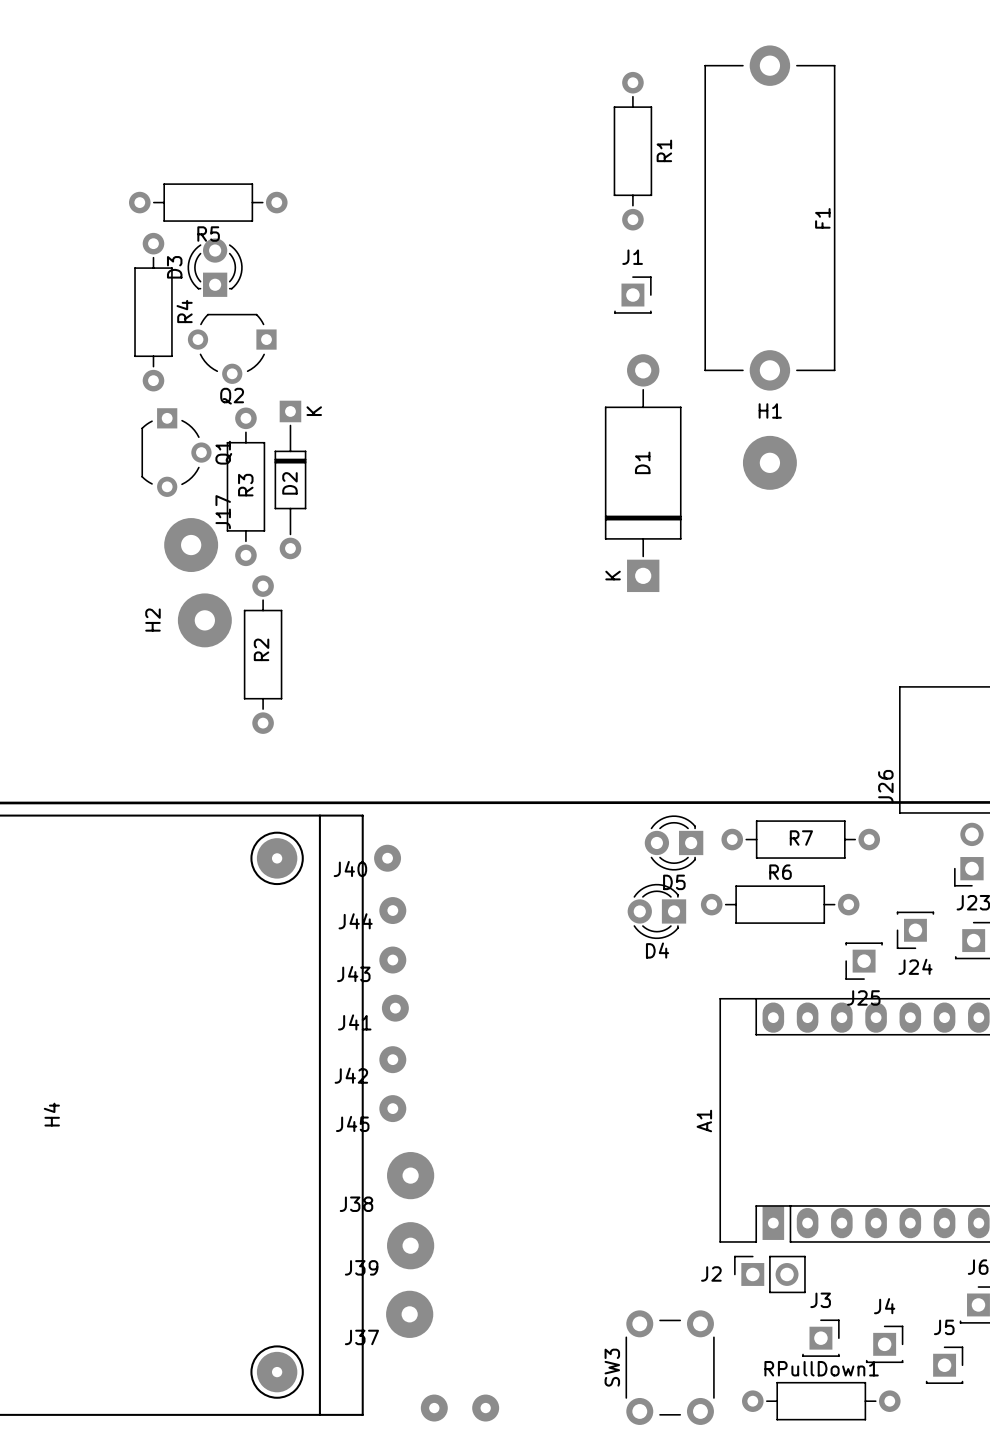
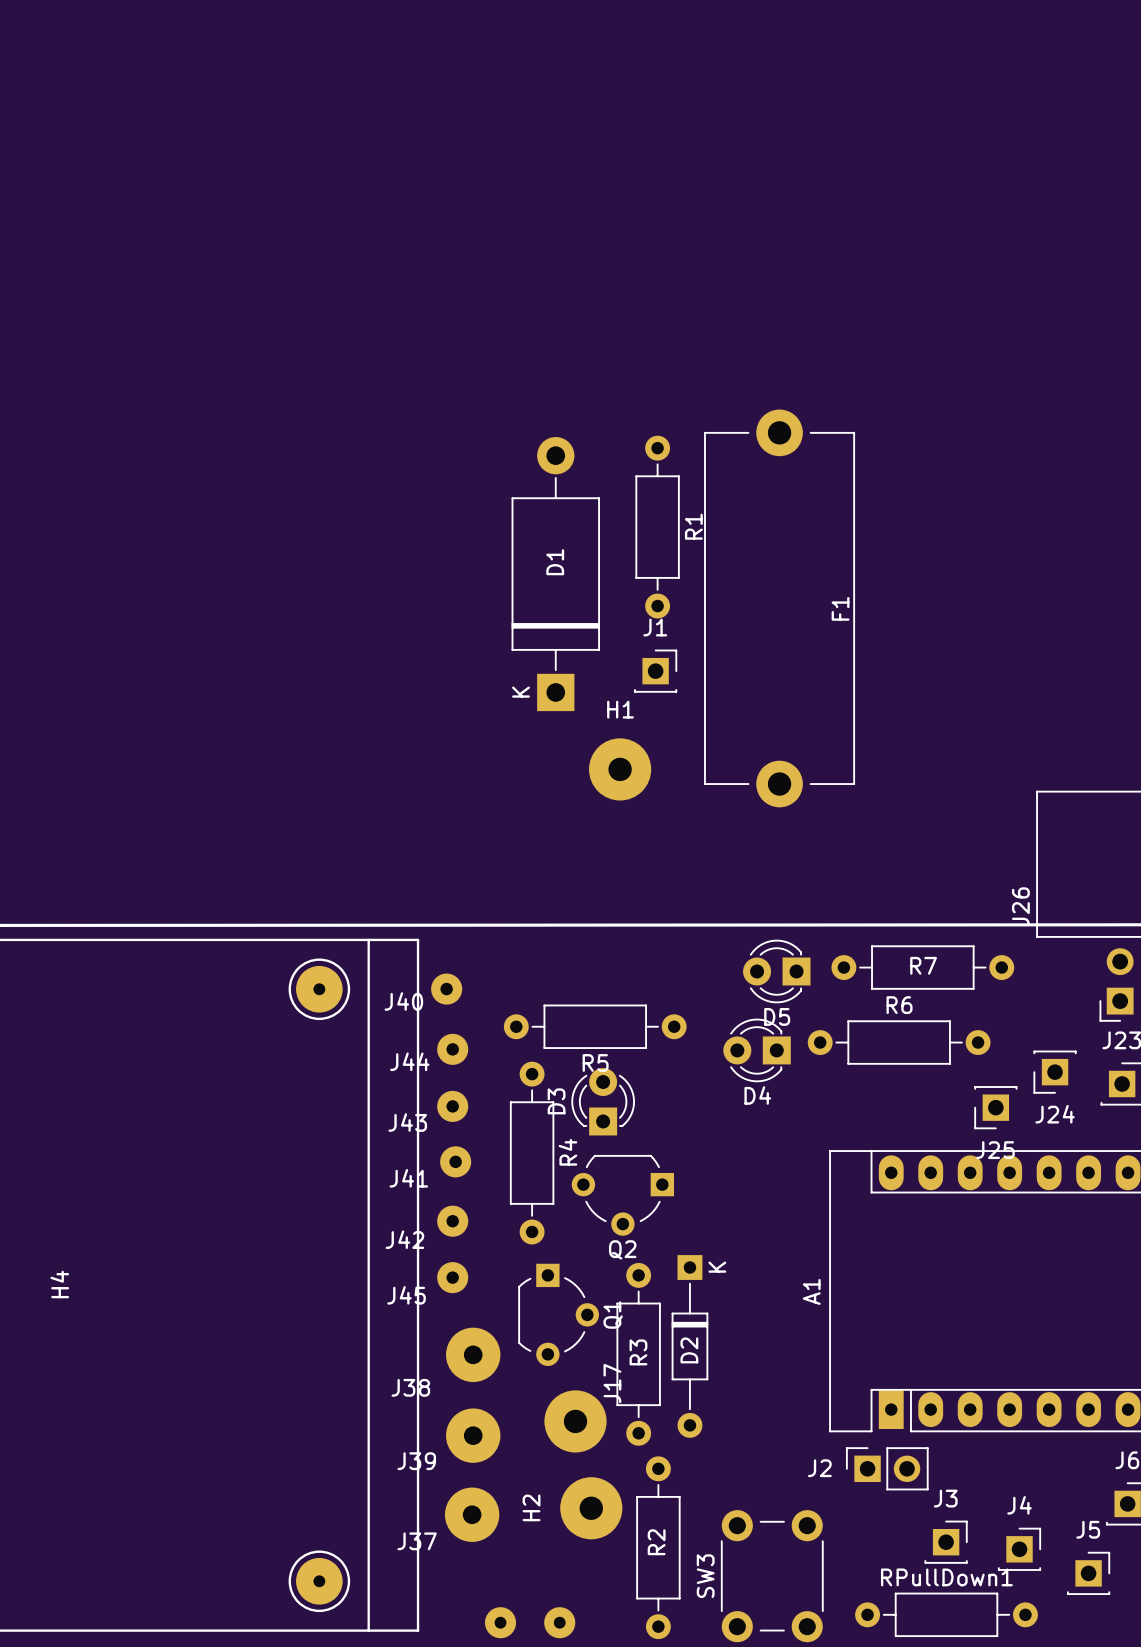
R1 position: (632, 151) -> (657, 527)
R5 position: (208, 202) -> (595, 1026)
F1 position: (769, 218) -> (779, 608)
D3 position: (215, 267) -> (603, 1101)
J1 position: (632, 295) -> (655, 671)
R4 position: (153, 312) -> (532, 1153)
Q2 position: (232, 348) -> (622, 1195)
Q1 position: (176, 452) -> (558, 1314)
H1 position: (769, 462) -> (620, 769)
D1 position: (643, 473) -> (555, 574)
D2 position: (290, 479) -> (689, 1346)
R3 position: (245, 486) -> (638, 1354)
J17 position: (191, 545) -> (575, 1421)
H2 position: (204, 620) -> (591, 1508)
R2 position: (263, 654) -> (658, 1547)

